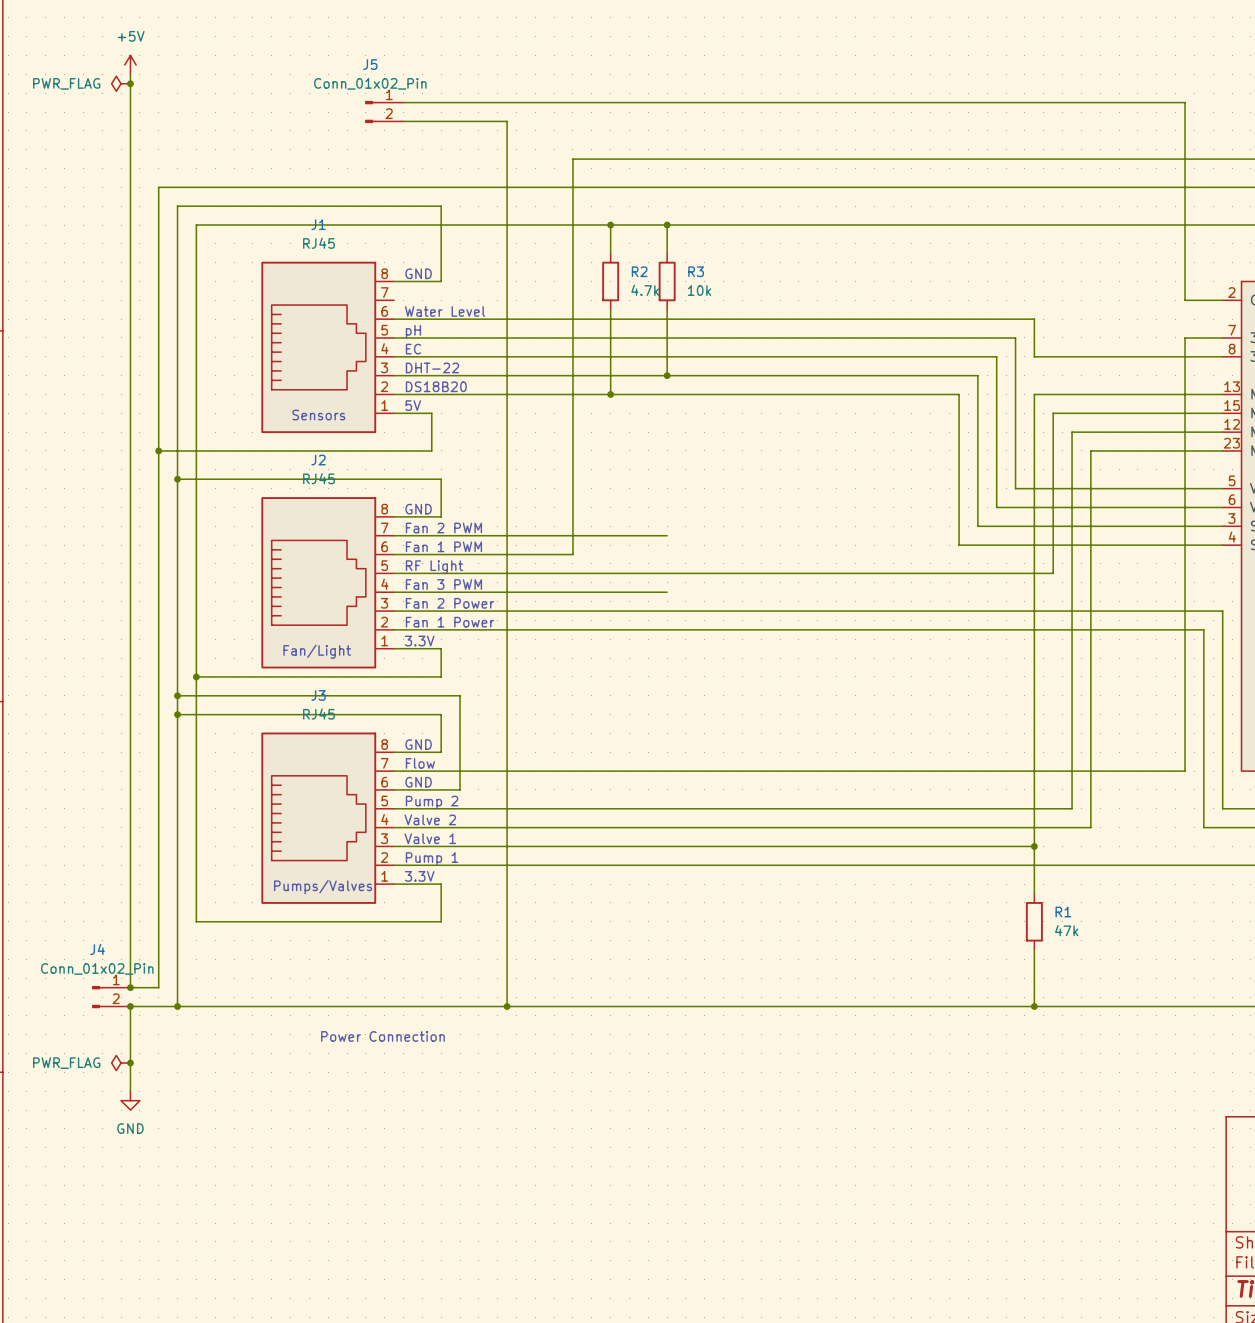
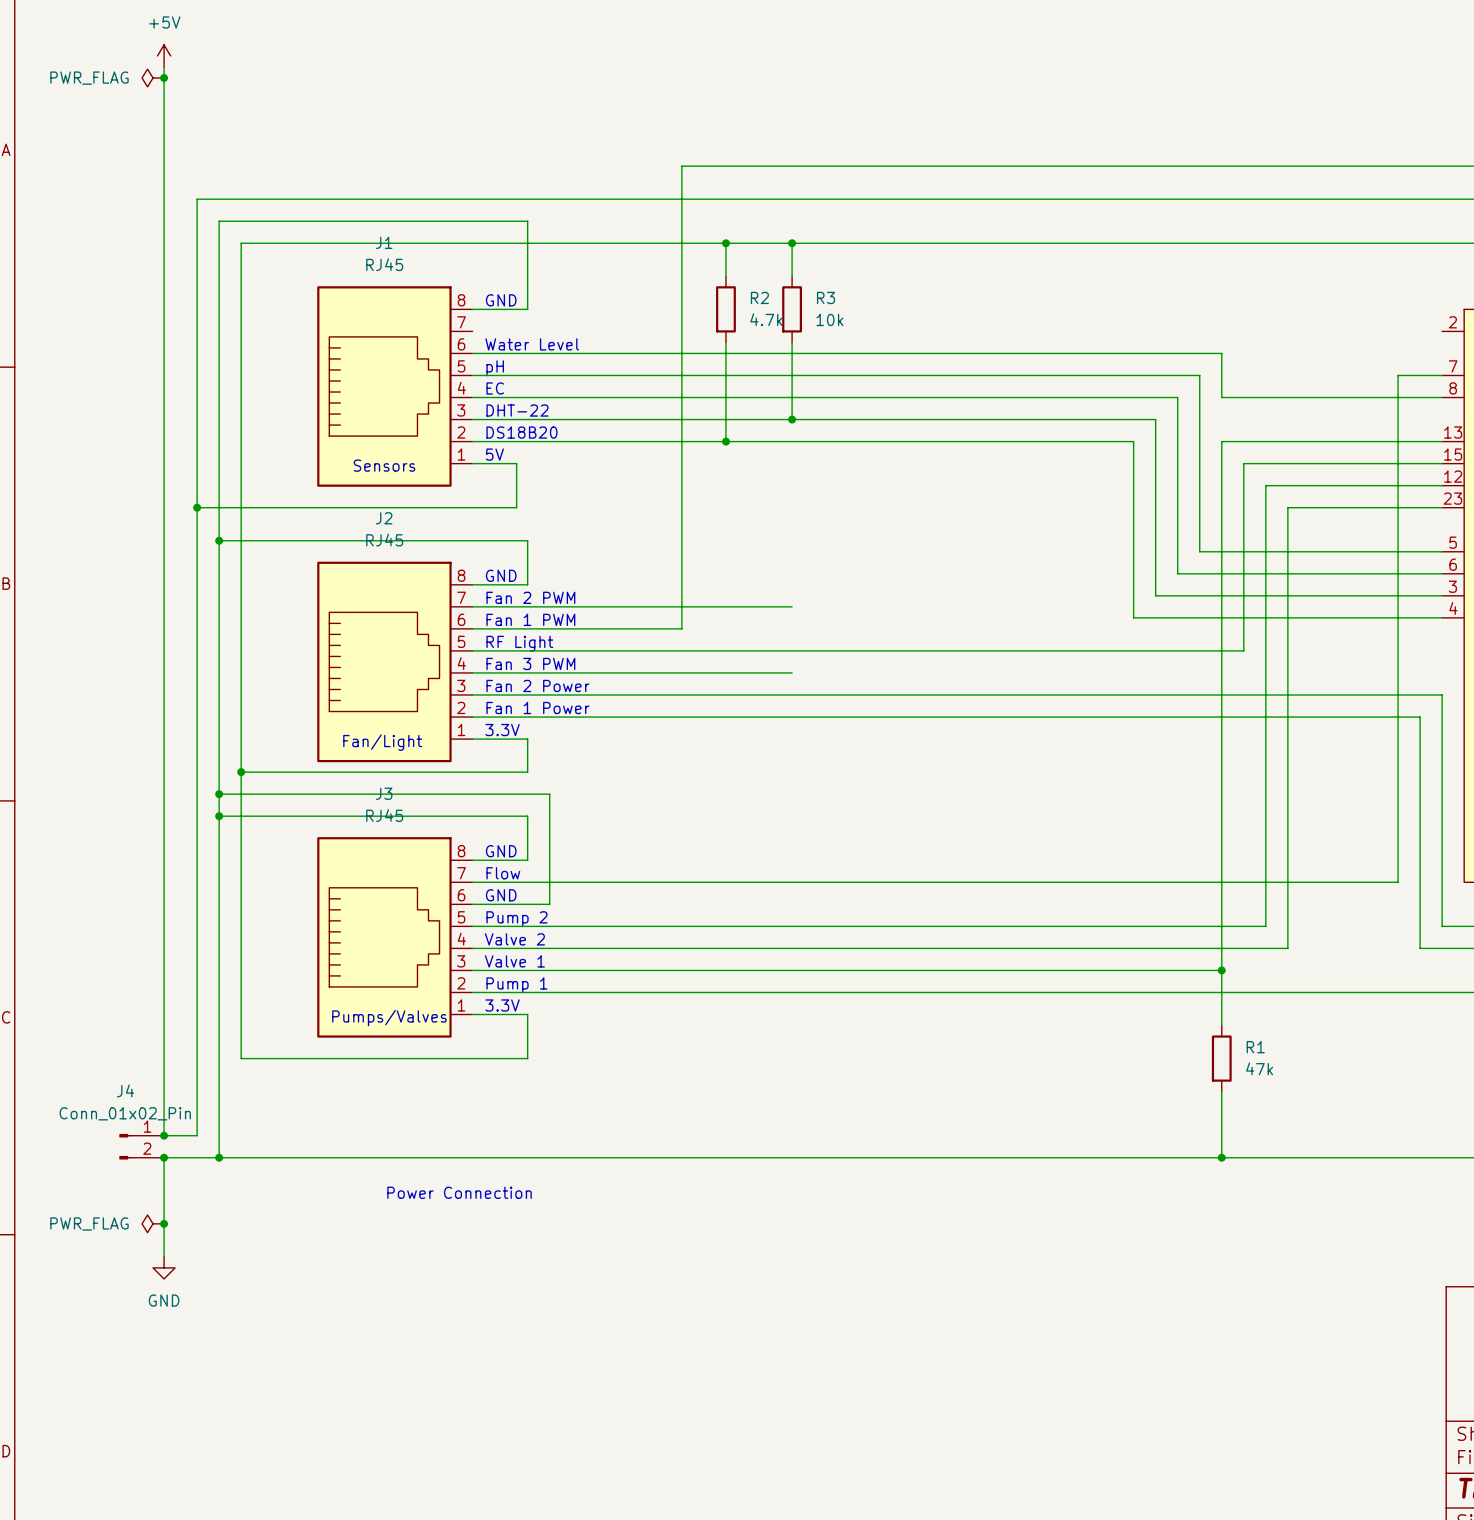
wire: (403, 102) (1185, 102) (1185, 300) (1222, 300) -> none
J5: Conn_01x02_Pin (384, 112) -> none
wire: (403, 121) (507, 121) (507, 1006) -> none
junction: (507, 1006) -> none

